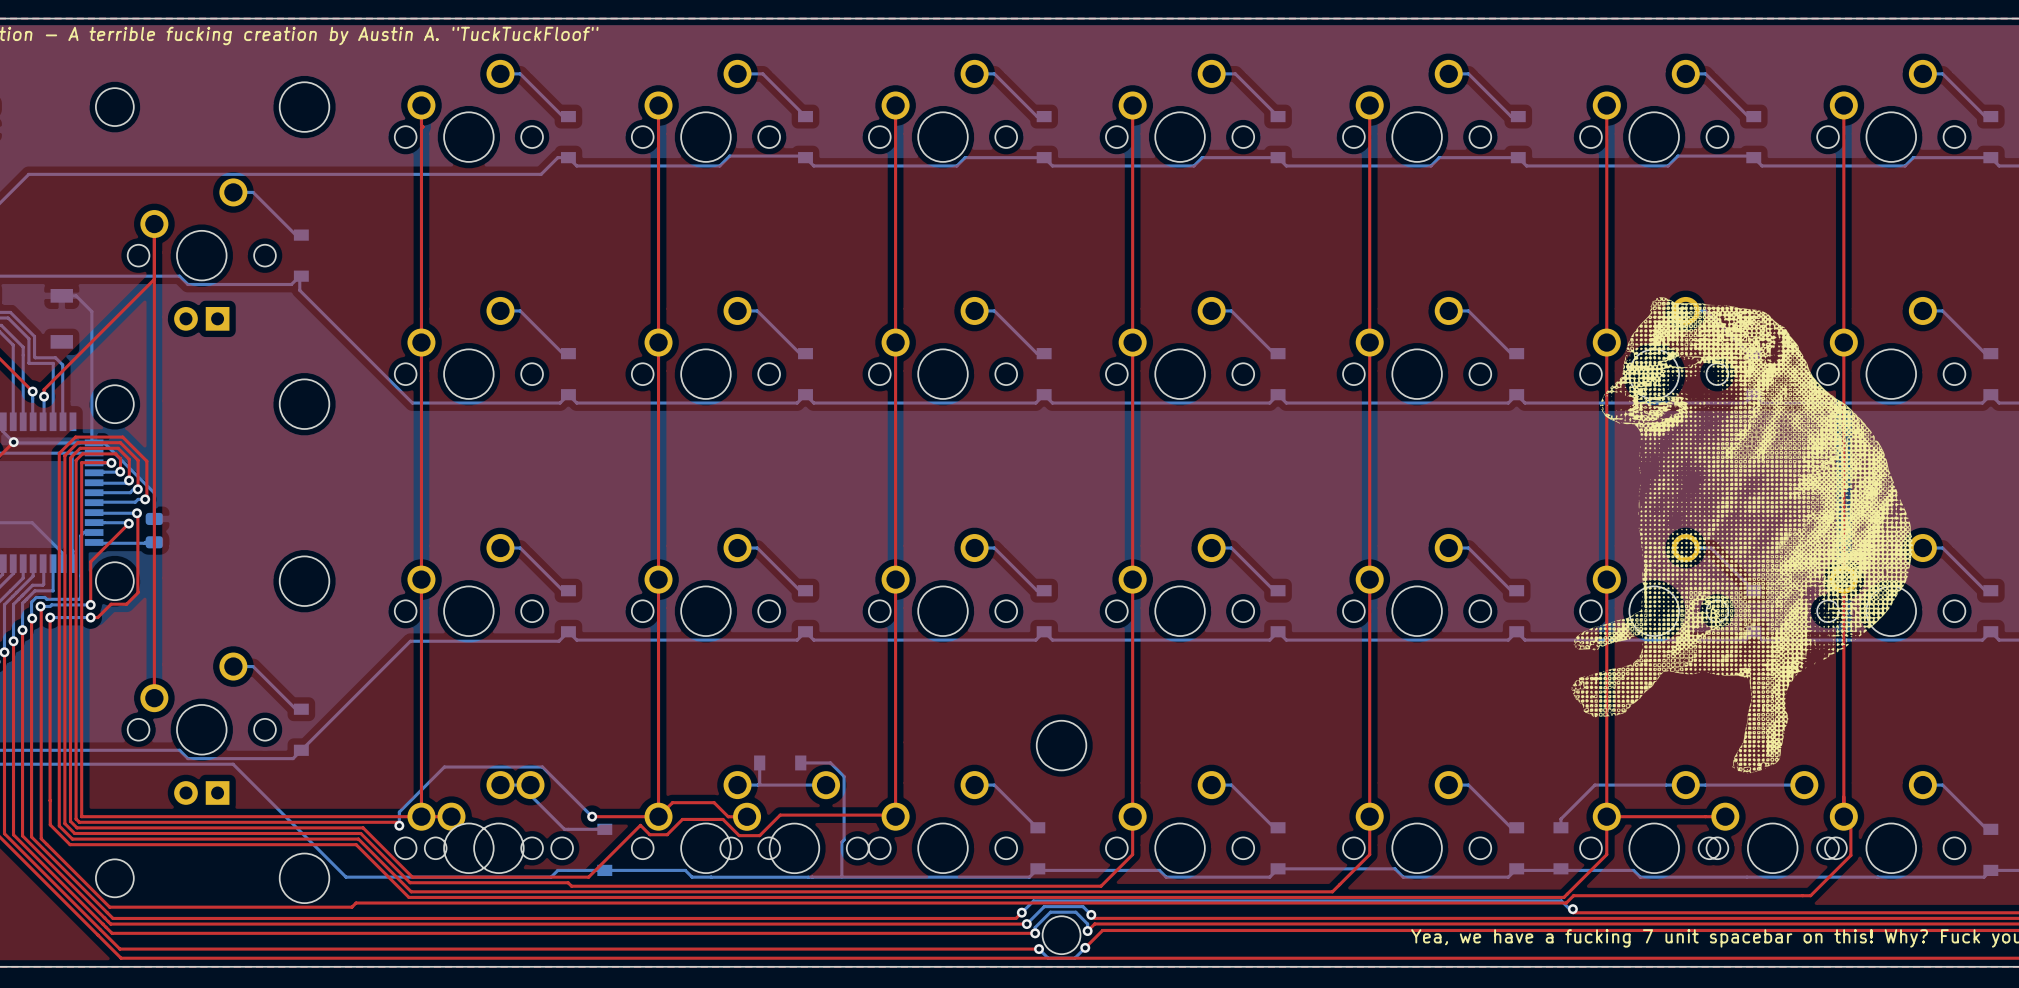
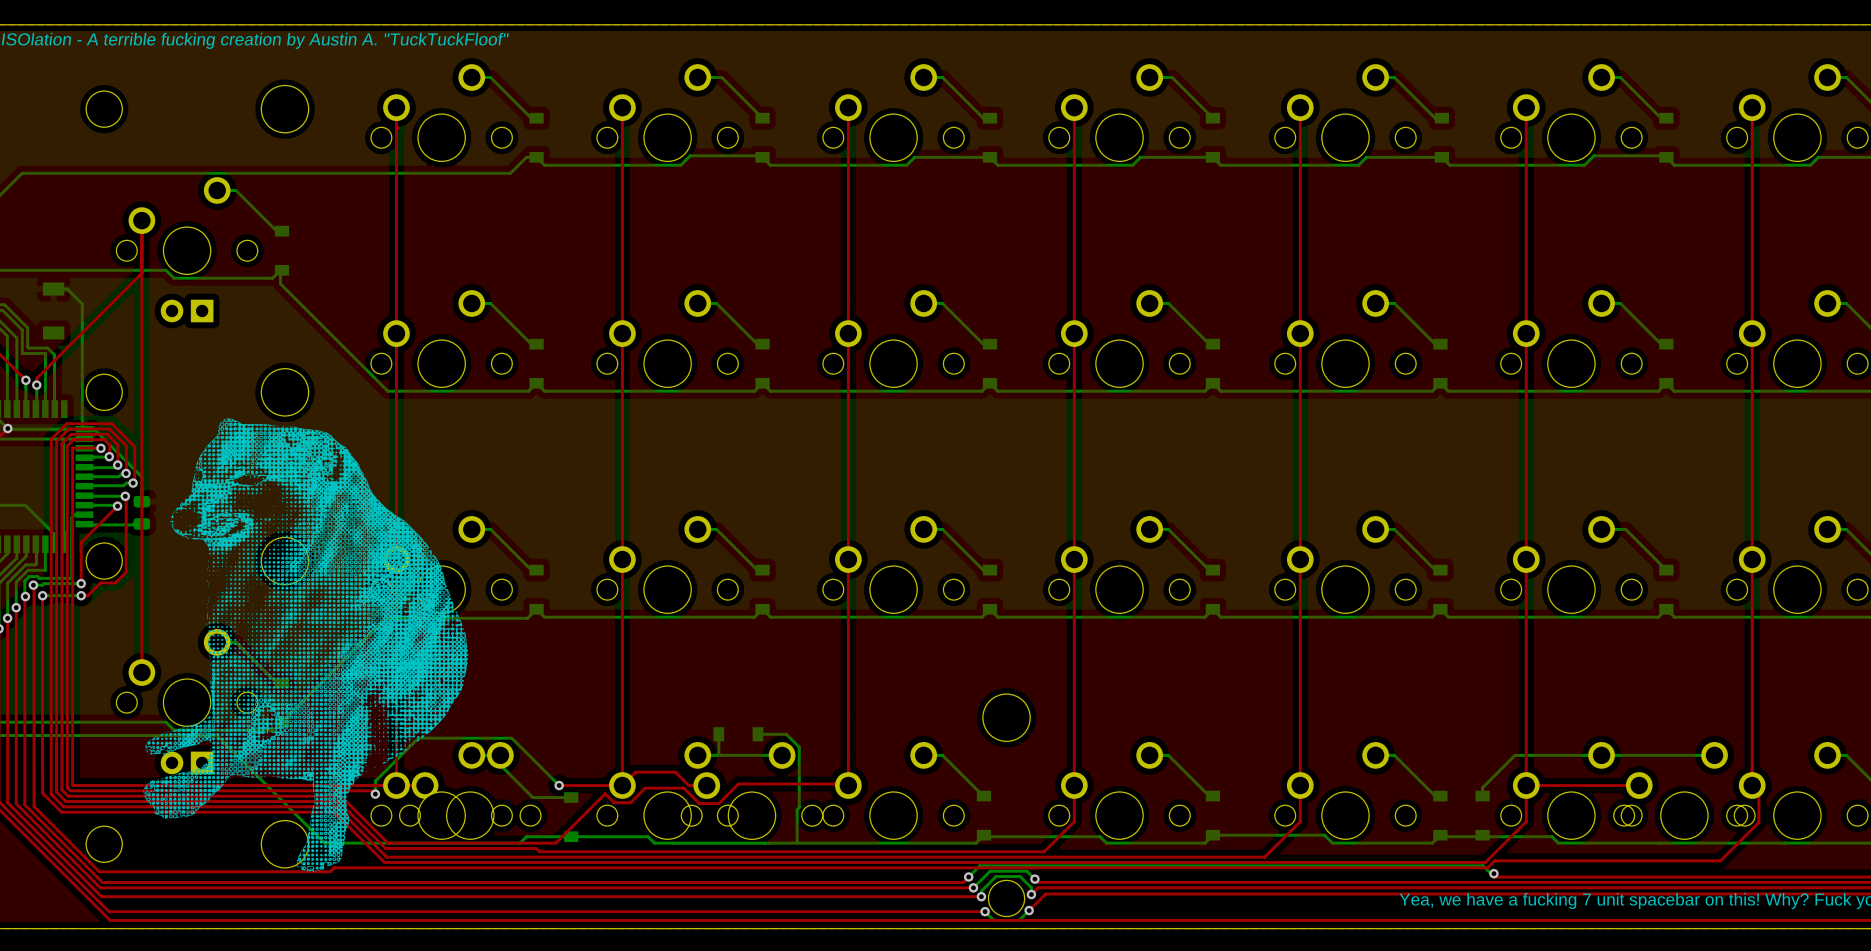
drawing: [1571, 297, 1913, 774] -> none
drawing: none -> [142, 418, 469, 873]

